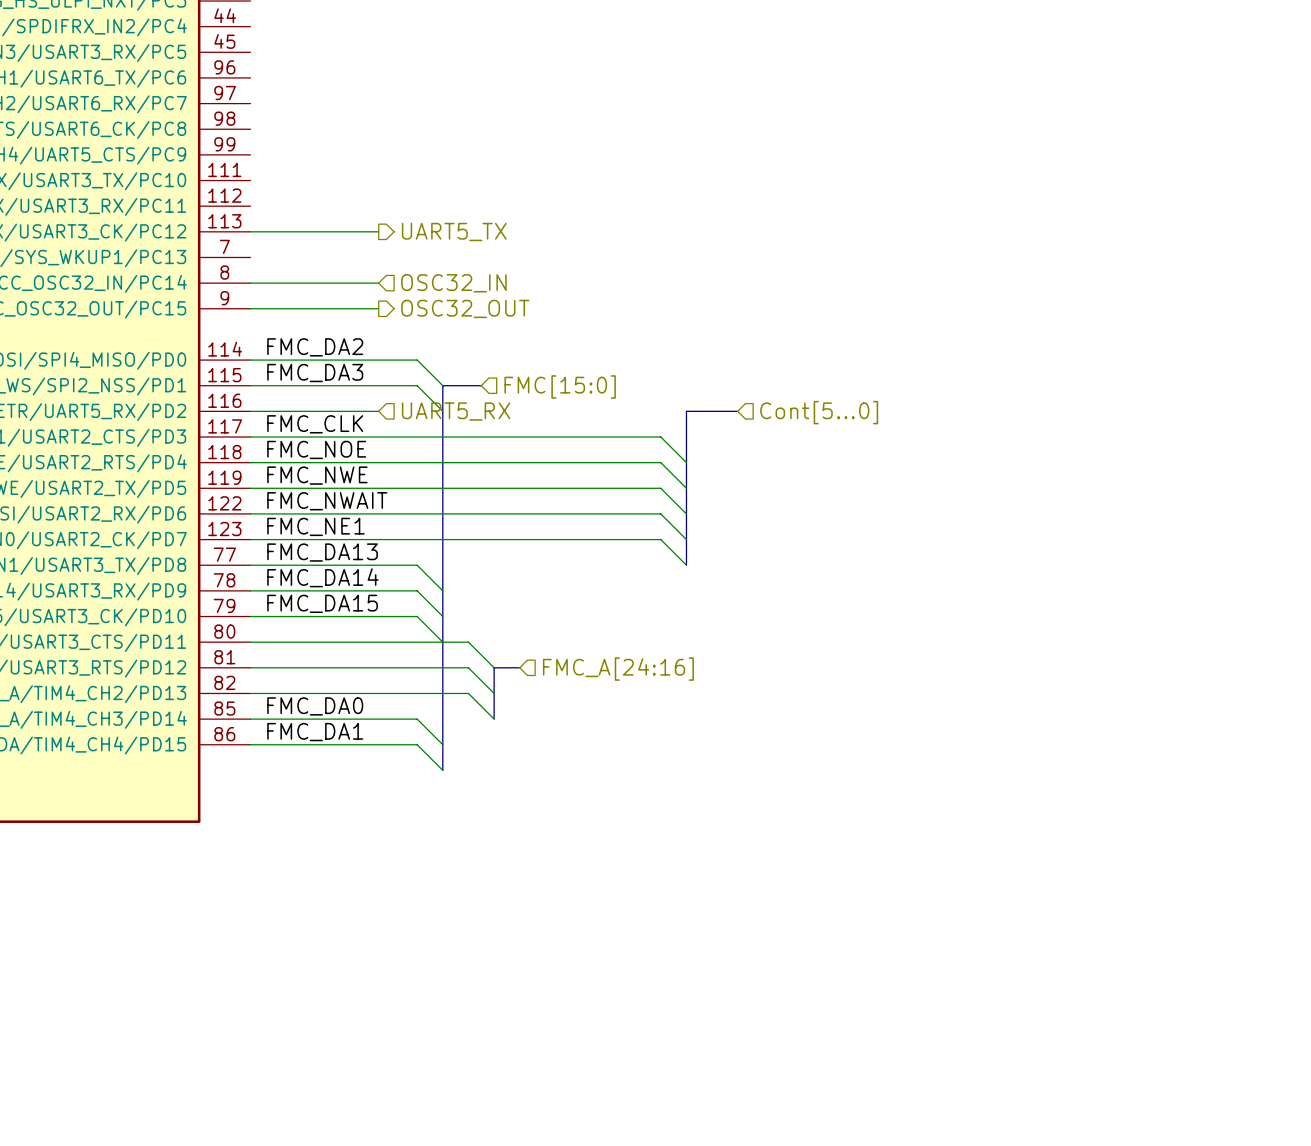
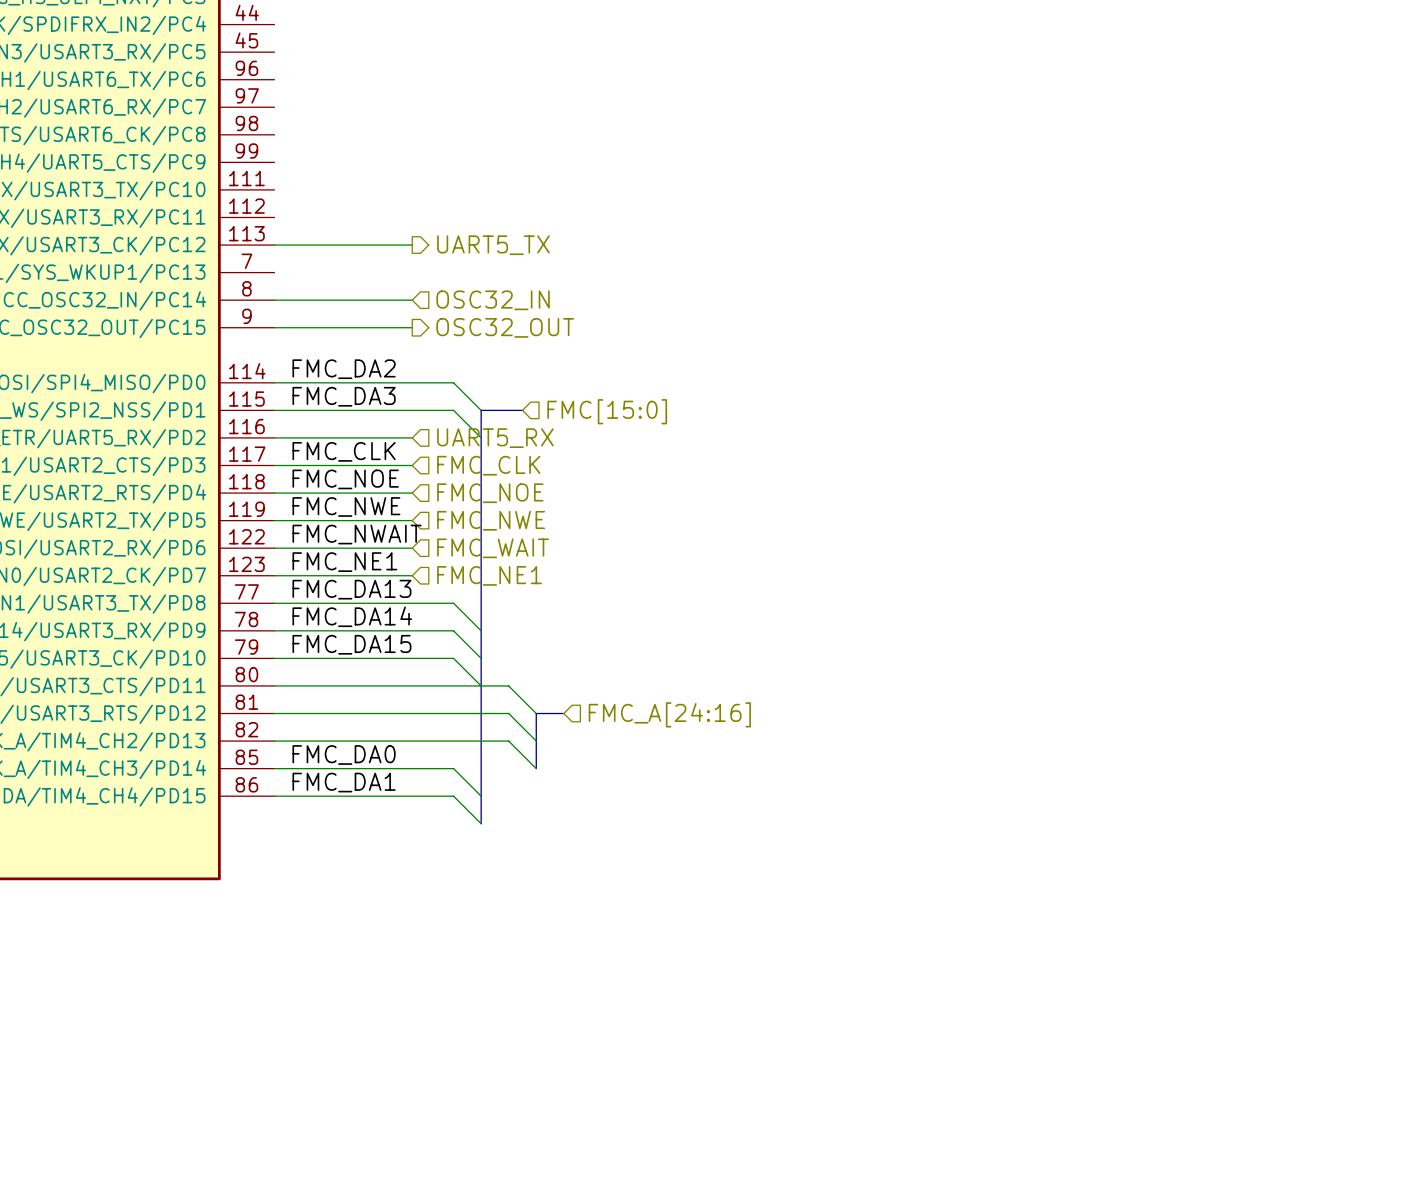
bus: (737, 411) (686, 411) (686, 565) -> none
hierarchical label: Cont[5...0] (819, 412) -> none
wire: (378, 437) (660, 437) (686, 462) -> none
hierarchical label: none -> FMC_CLK (488, 465)
wire: (378, 462) (660, 462) (686, 488) -> none
hierarchical label: none -> FMC_NOE (490, 493)
wire: (378, 488) (660, 488) (686, 513) -> none
hierarchical label: none -> FMC_NWE (491, 520)
wire: (378, 513) (660, 513) (686, 539) -> none
hierarchical label: none -> FMC_WAIT (493, 548)
wire: (378, 539) (660, 539) (686, 565) -> none
hierarchical label: none -> FMC_NE1 (489, 575)

